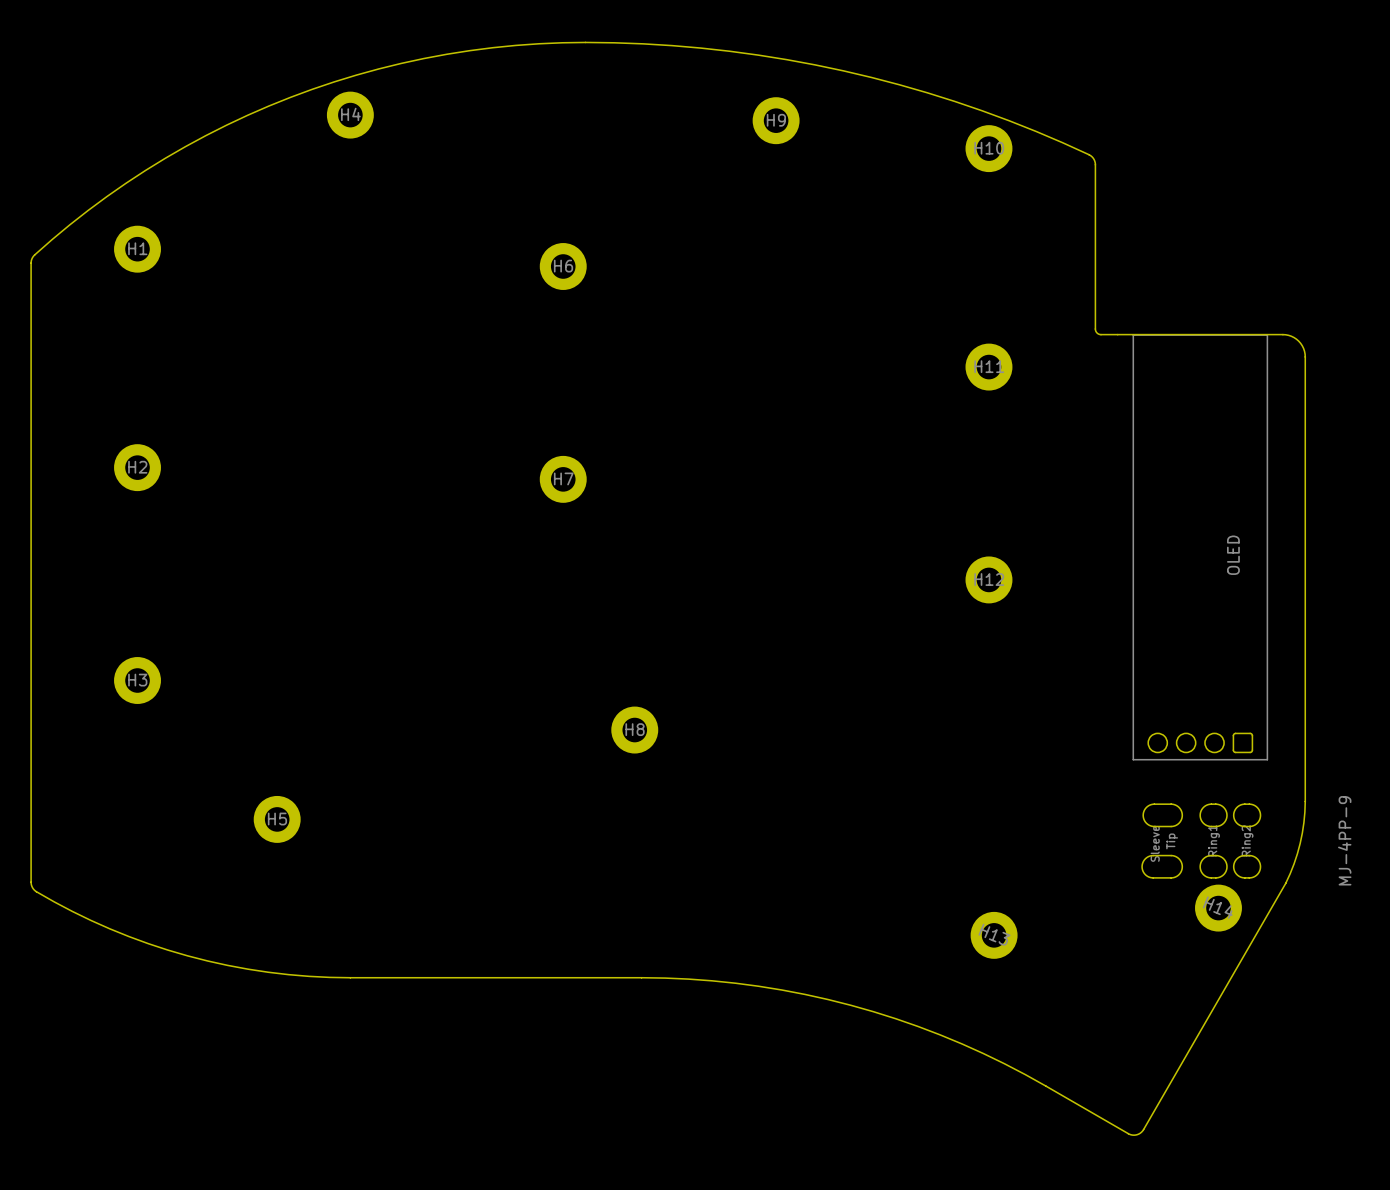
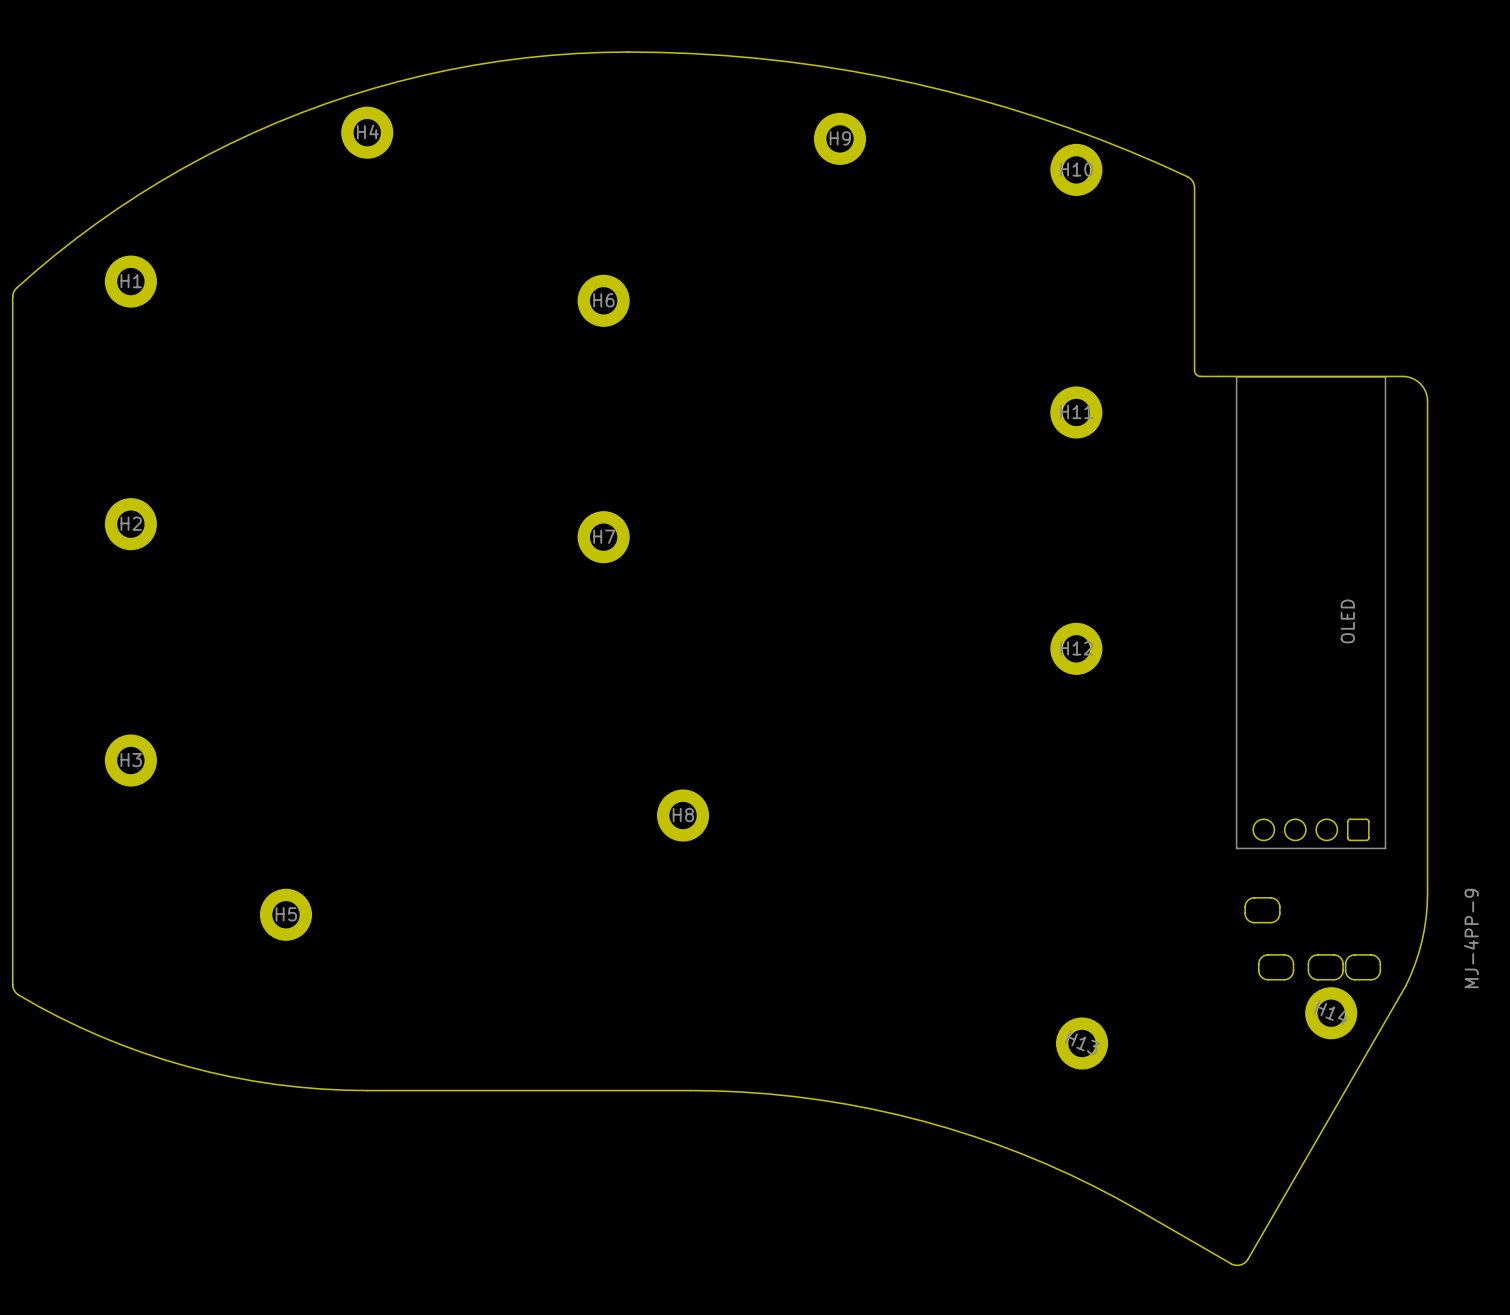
drawing shape: [1141, 796, 1352, 886] -> [1244, 888, 1479, 989]

